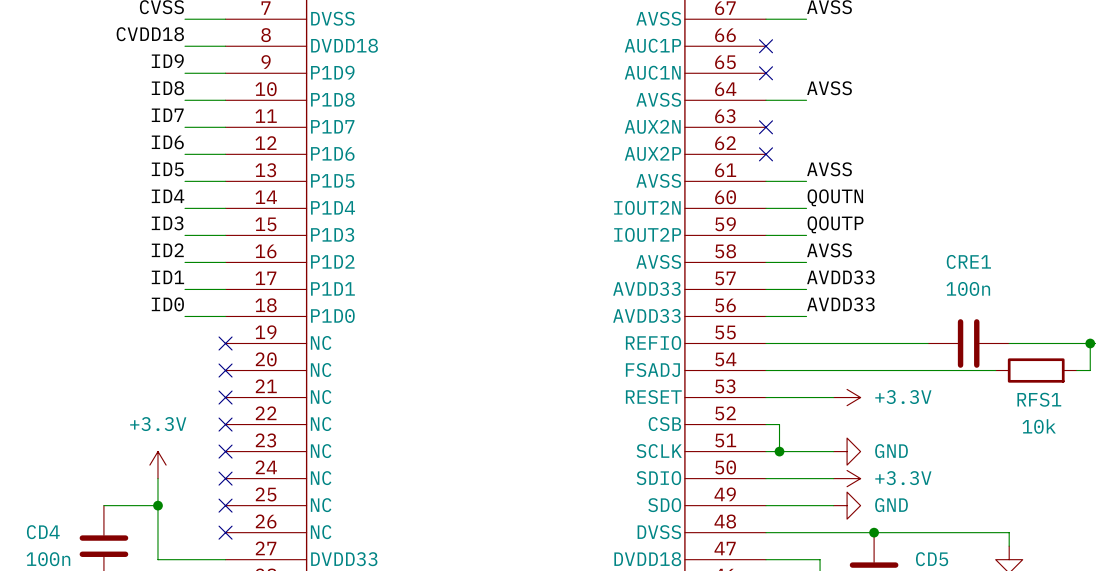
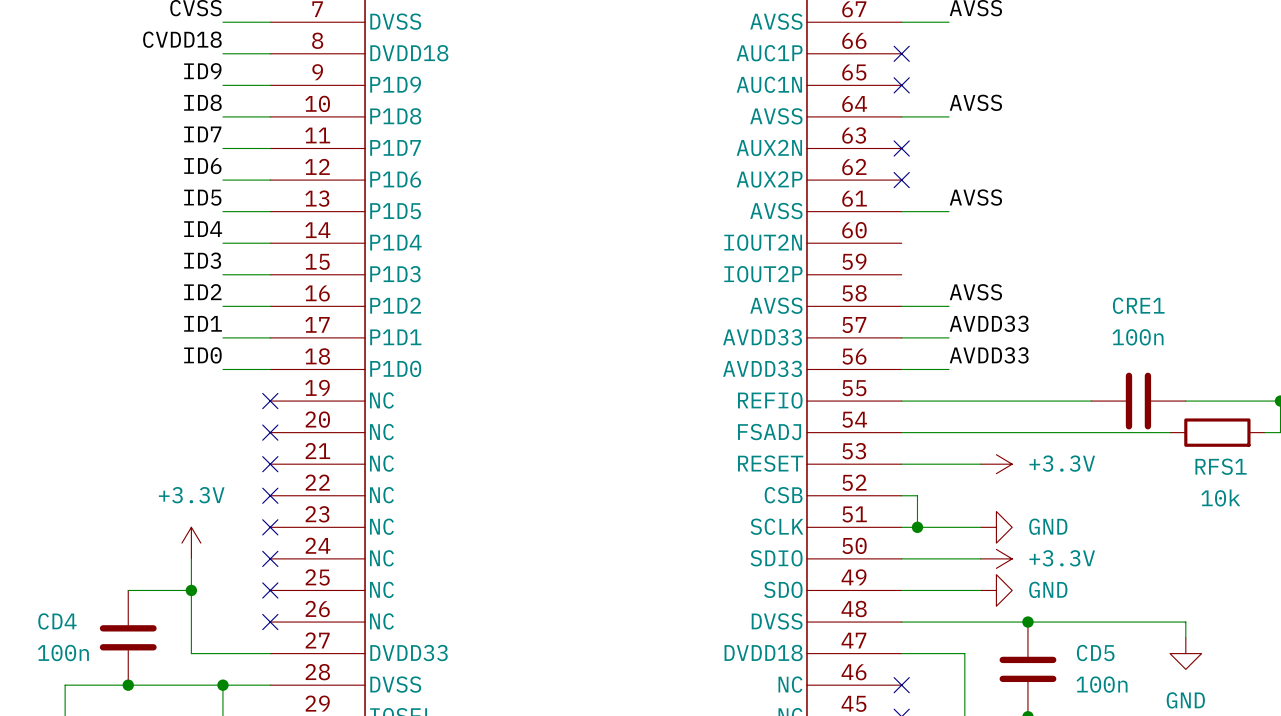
label: QOUTN (835, 197) -> none
wire: (765, 208) (806, 208) -> none
label: QOUTP (835, 224) -> none
wire: (765, 235) (806, 235) -> none

